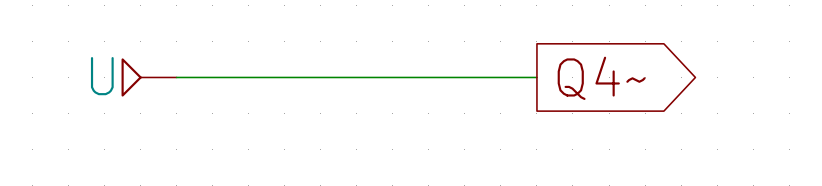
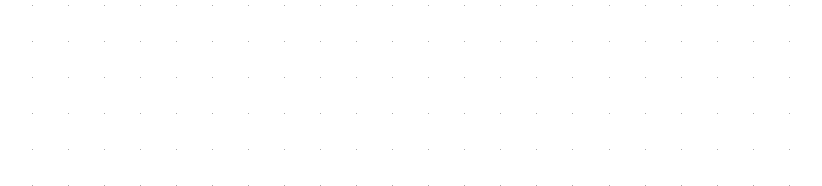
U: (149, 77) -> none
wire: (176, 77) (536, 77) -> none
global label: Q4~ (601, 78) -> none

